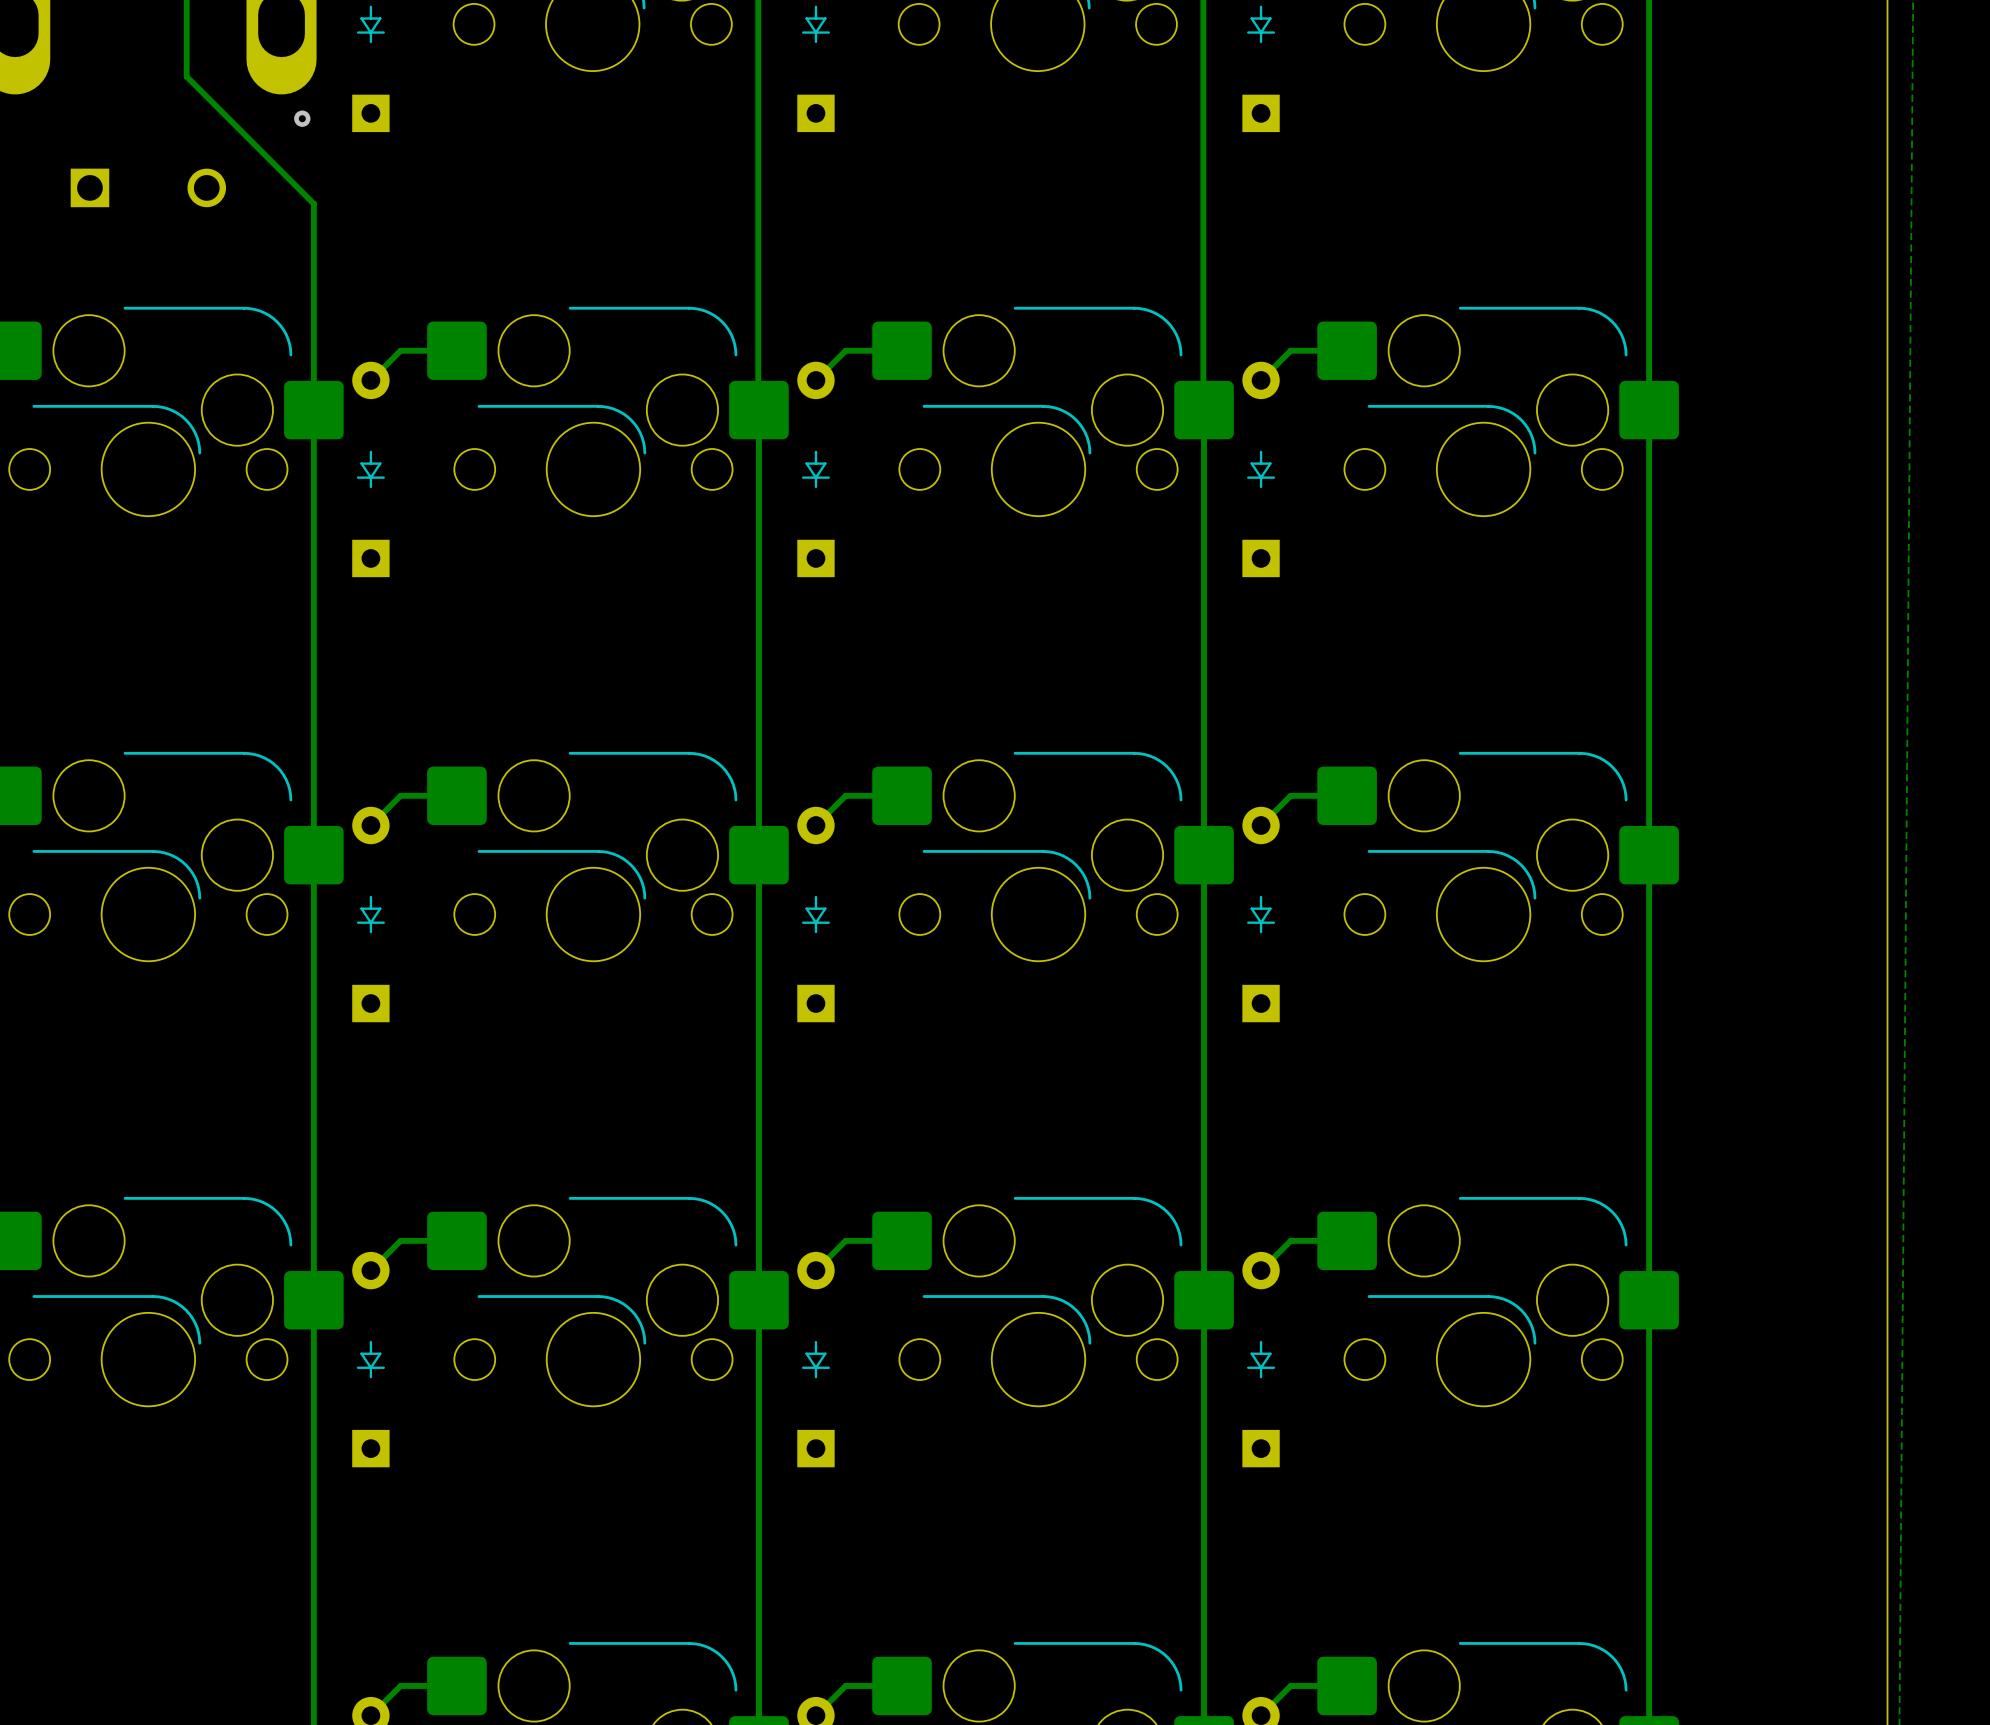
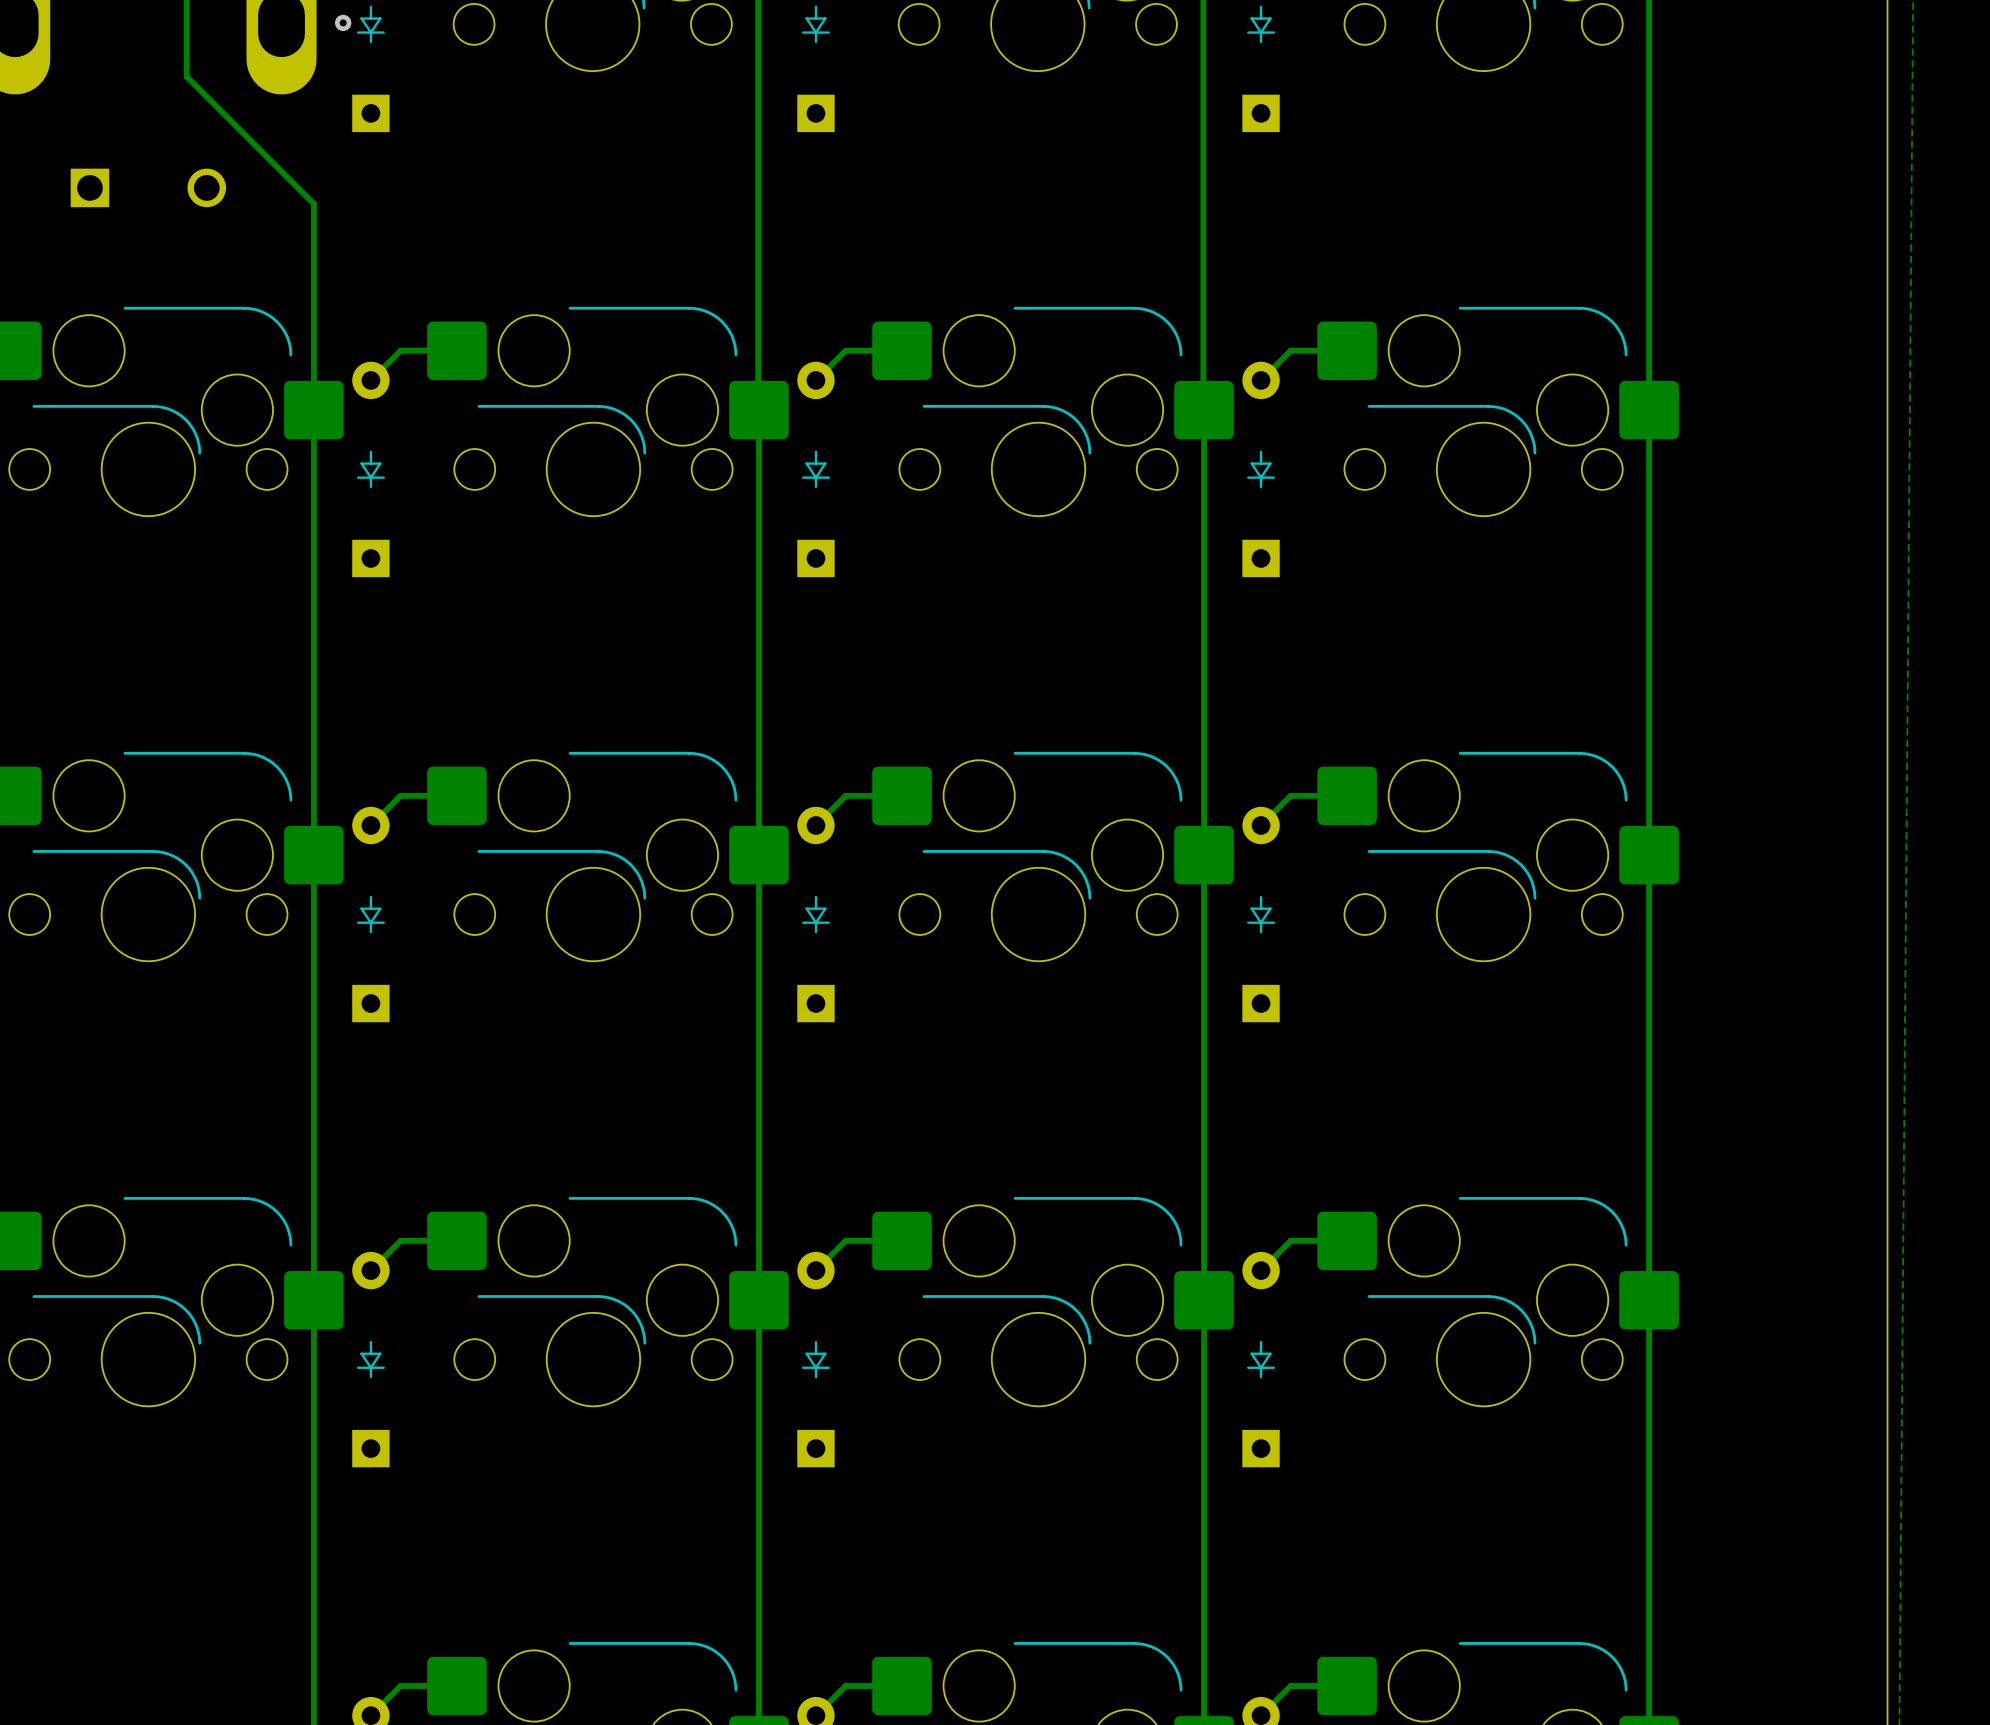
via position: (302, 118) -> (343, 22)

